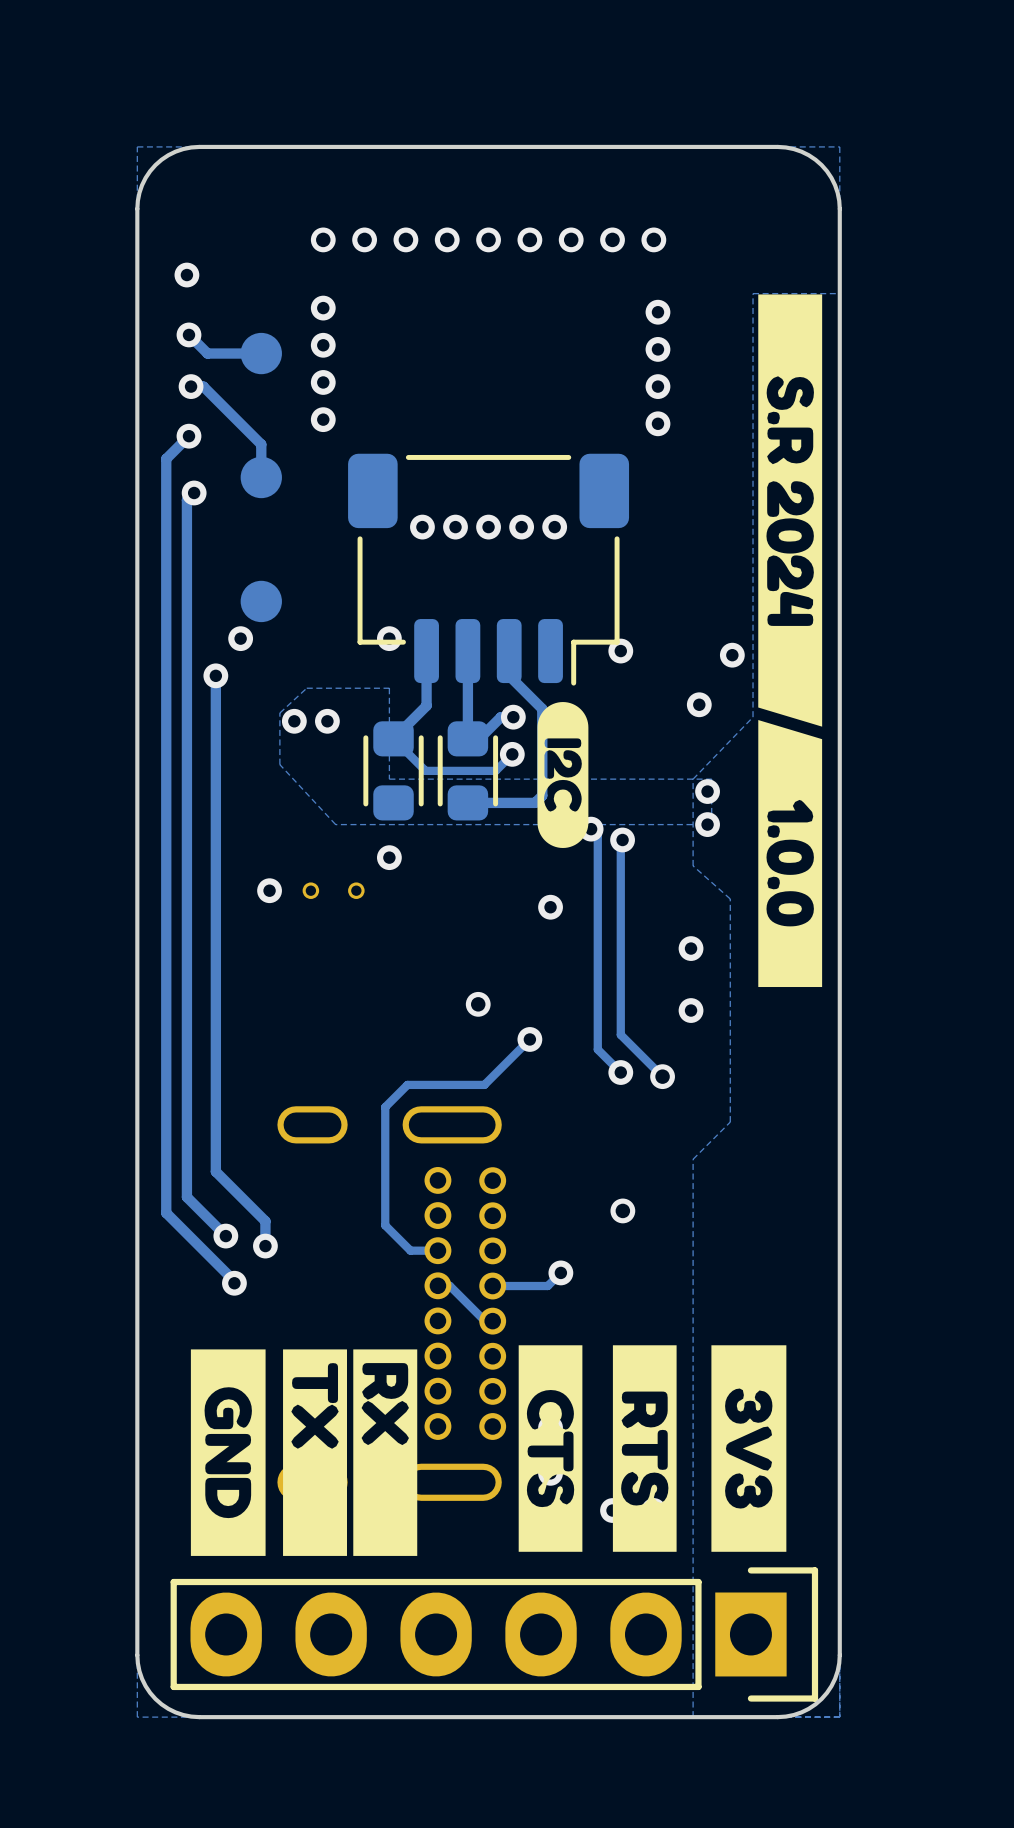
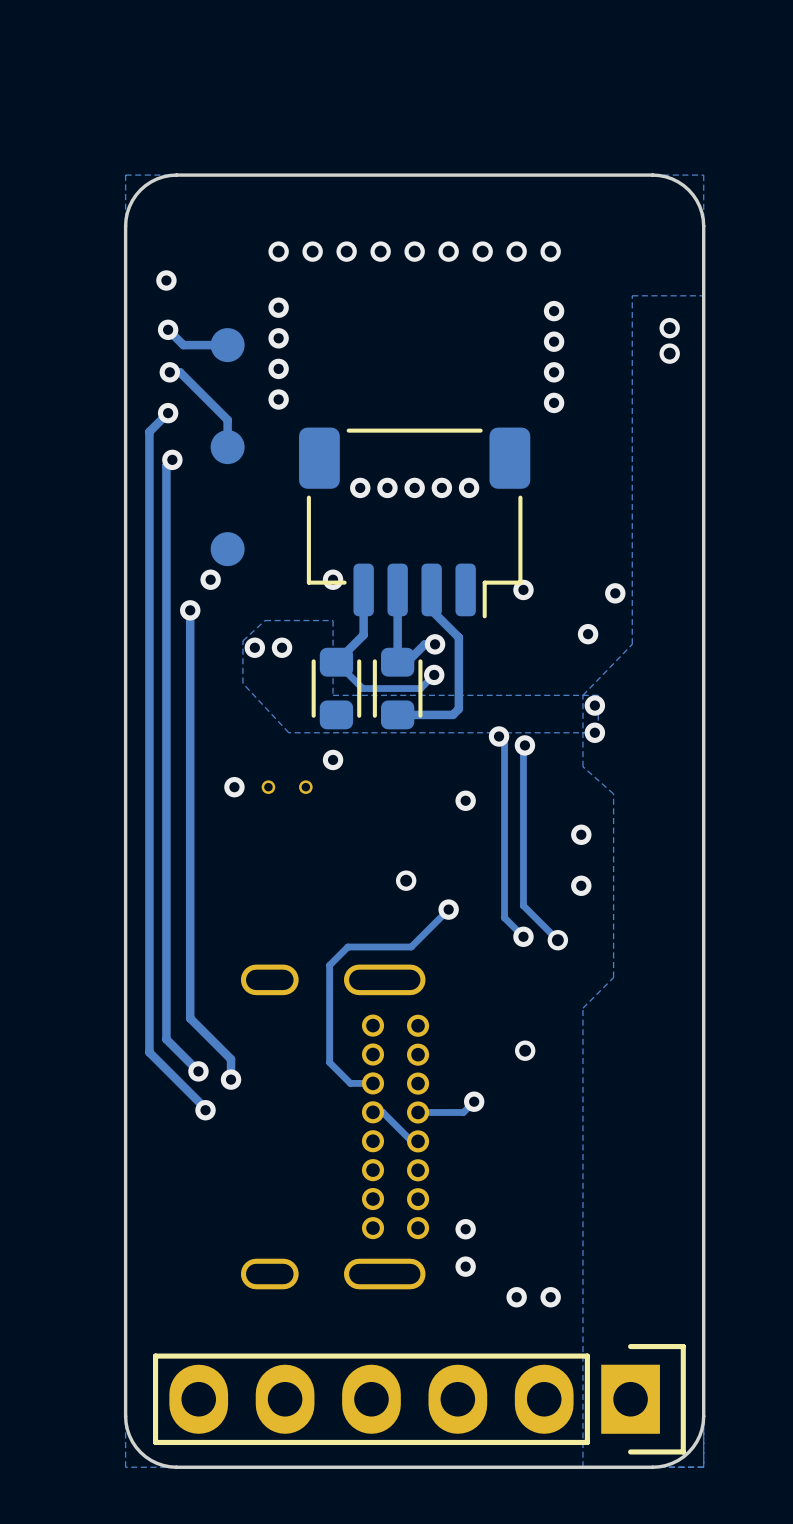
drawing: [758, 294, 823, 988] -> none
drawing: [537, 702, 589, 849] -> none
drawing: [518, 1345, 787, 1552] -> none
drawing: [190, 1349, 418, 1556] -> none

